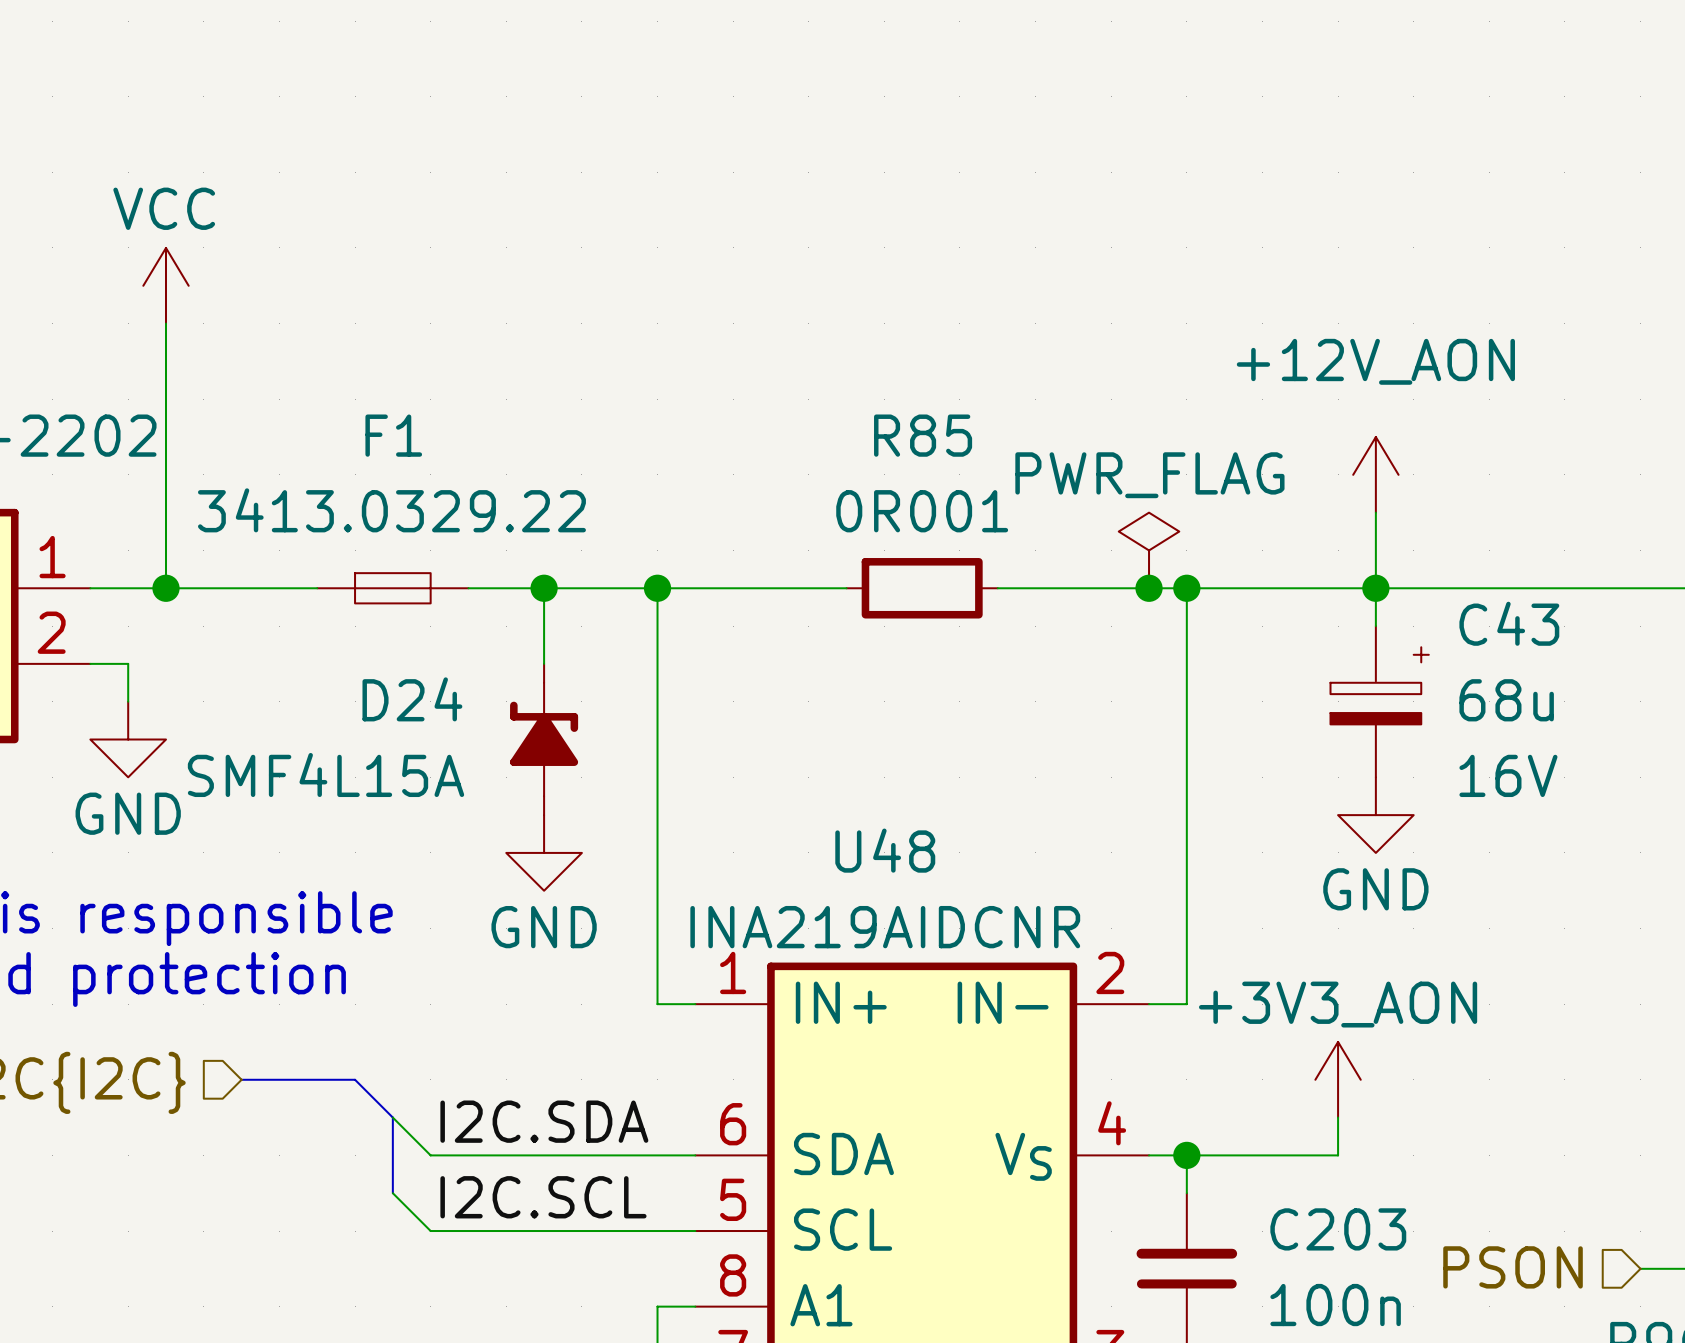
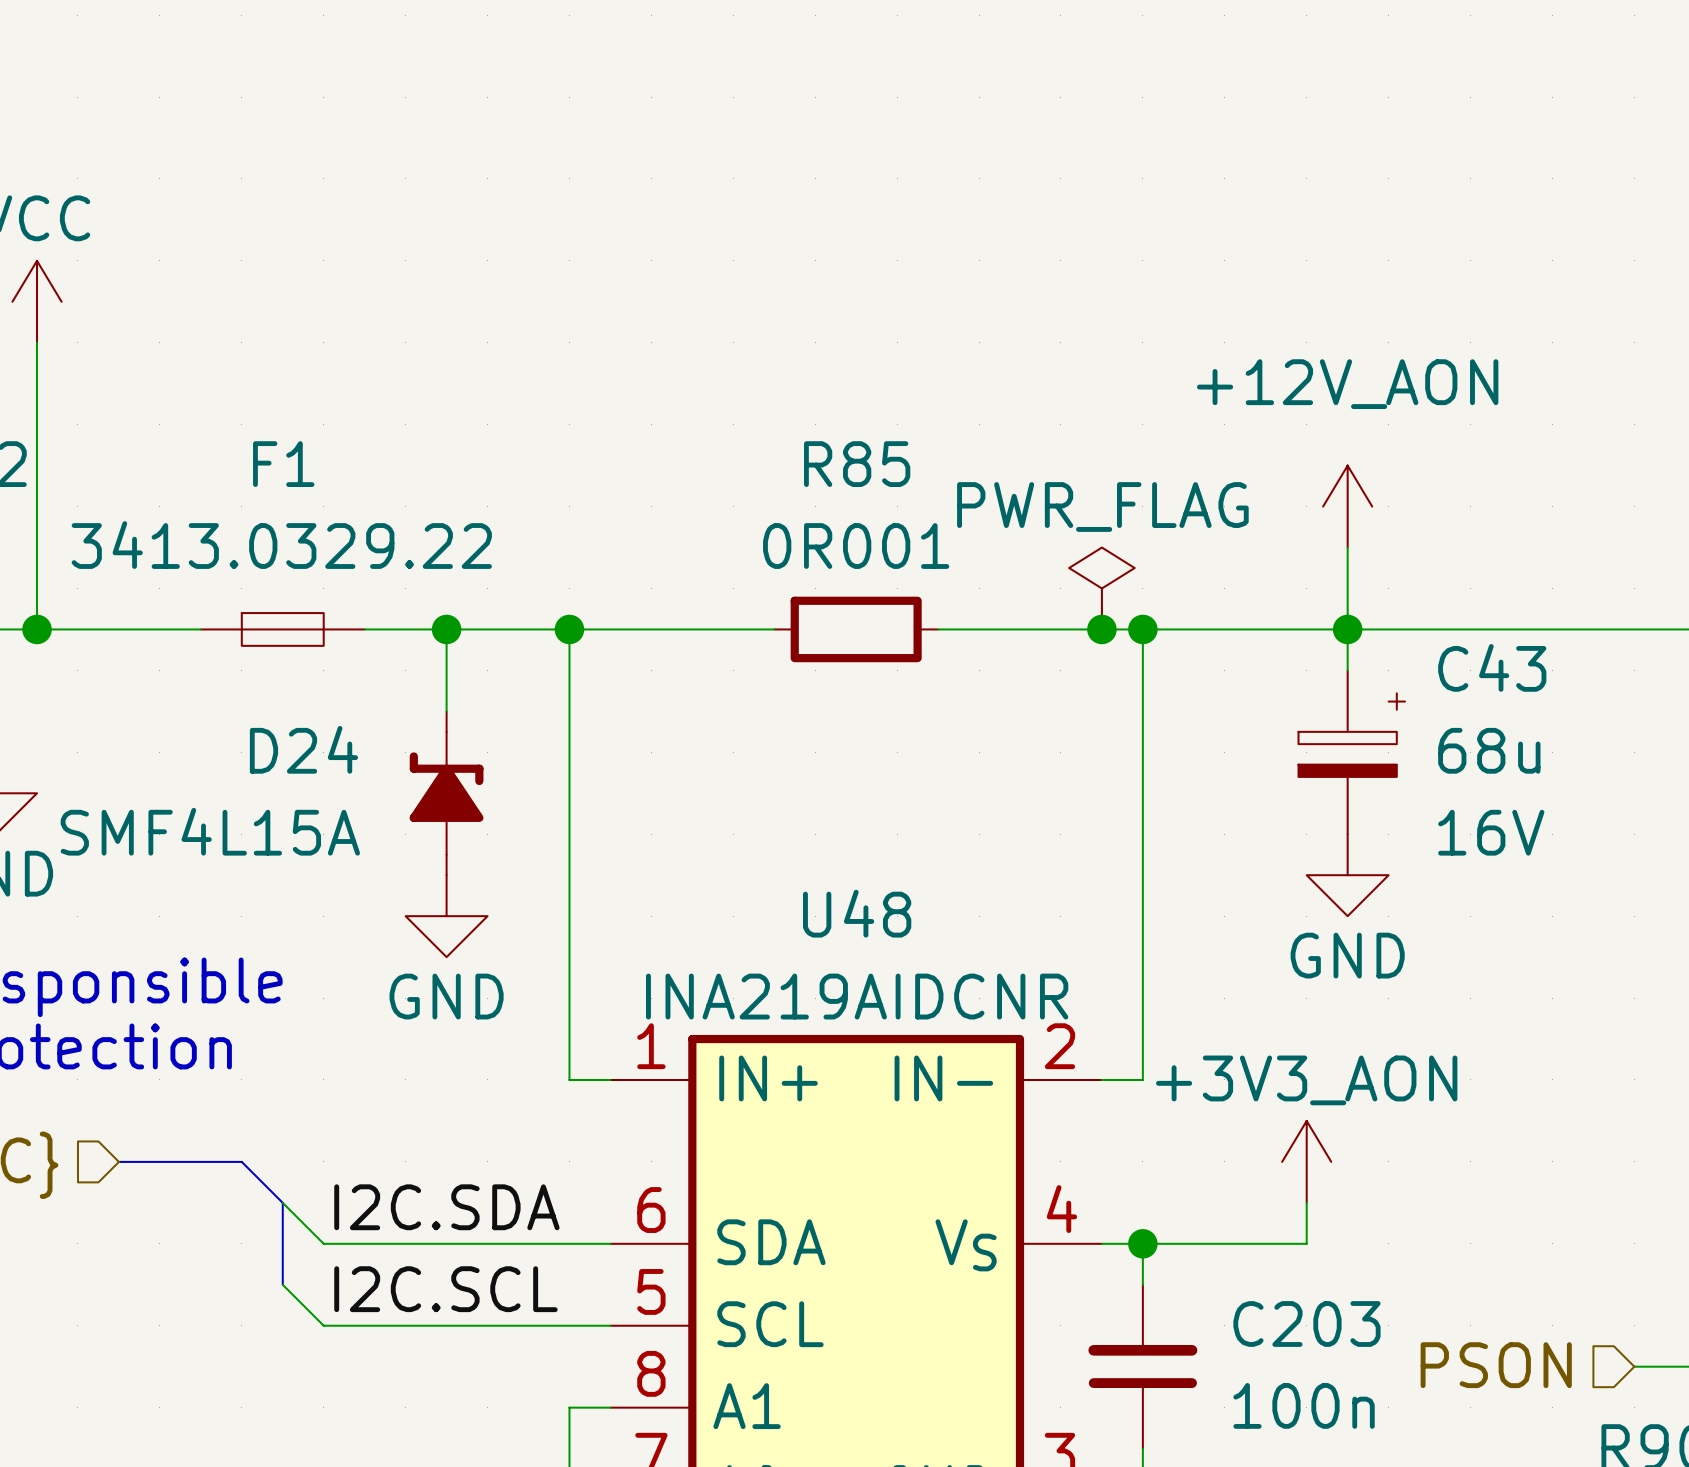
U48 name position: U48 (885, 850) -> U48 (857, 913)
U48 text position: INA219AIDCNR (885, 927) -> INA219AIDCNR (857, 996)

